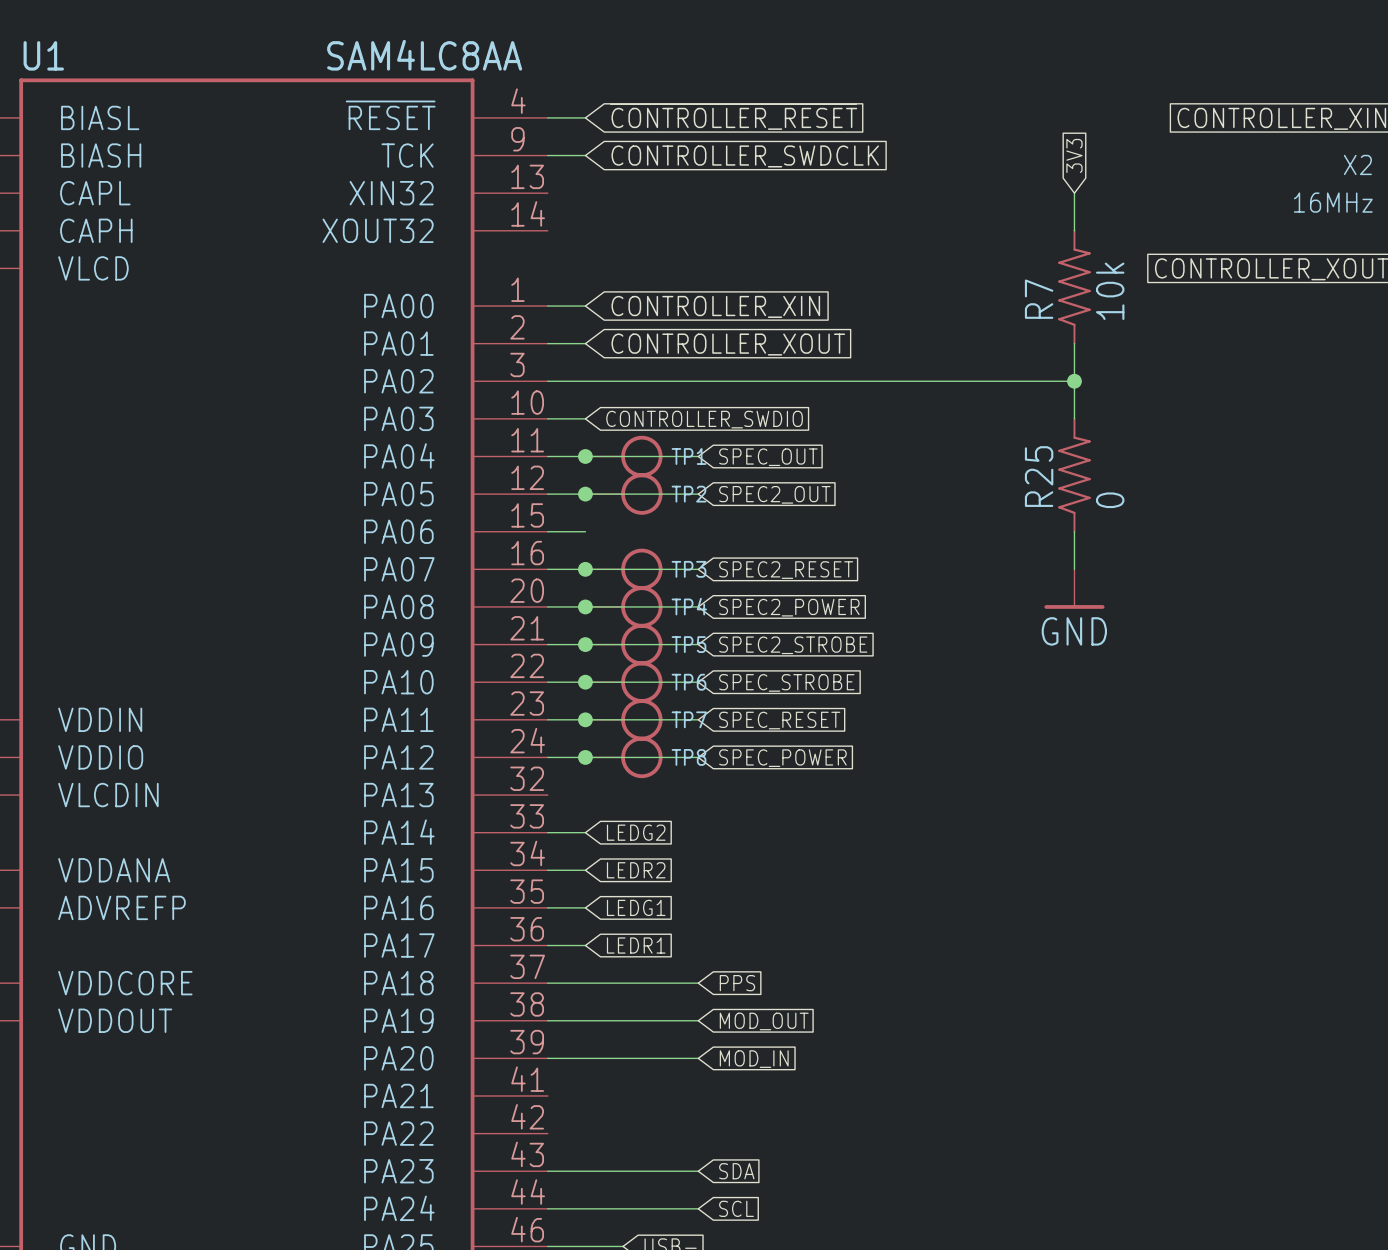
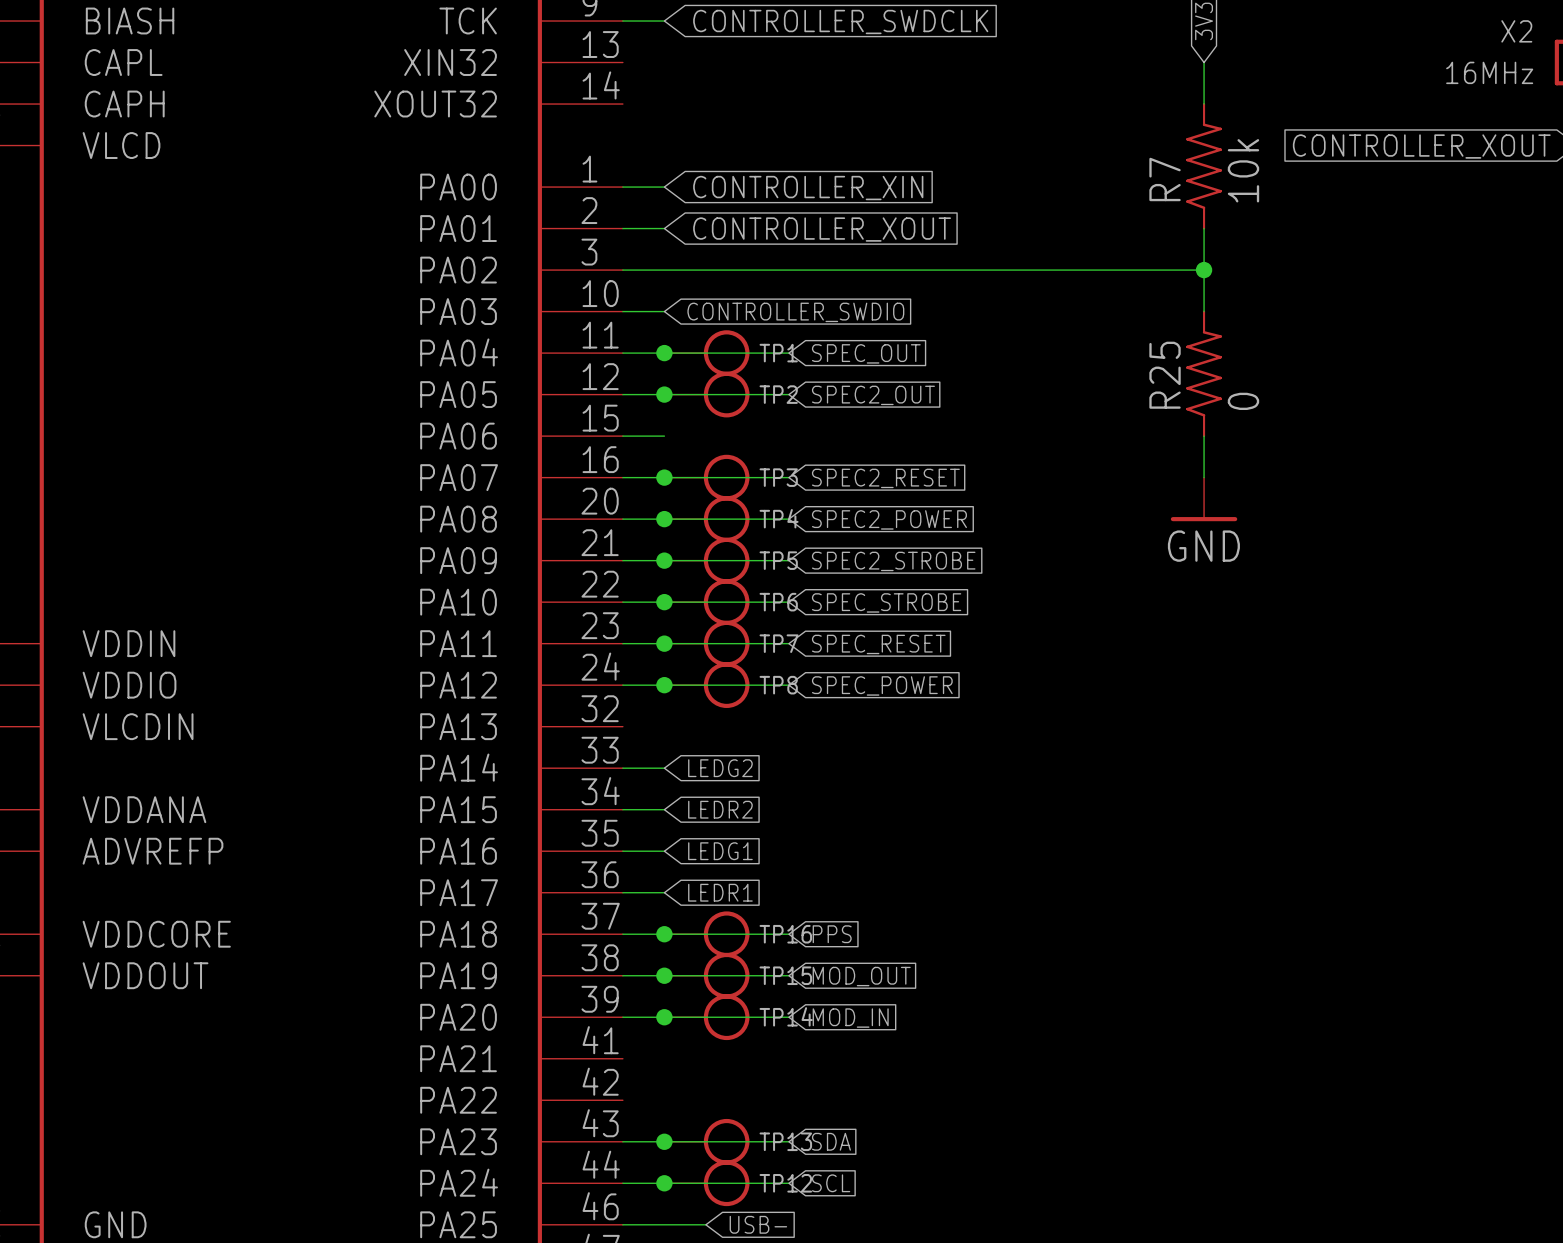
junction: none -> (664, 934)
TP16: none -> (706, 934)
junction: none -> (664, 975)
TP15: none -> (706, 975)
junction: none -> (664, 1017)
TP14: none -> (706, 1017)
junction: none -> (664, 1141)
TP13: none -> (706, 1141)
junction: none -> (664, 1183)
TP12: none -> (706, 1183)

